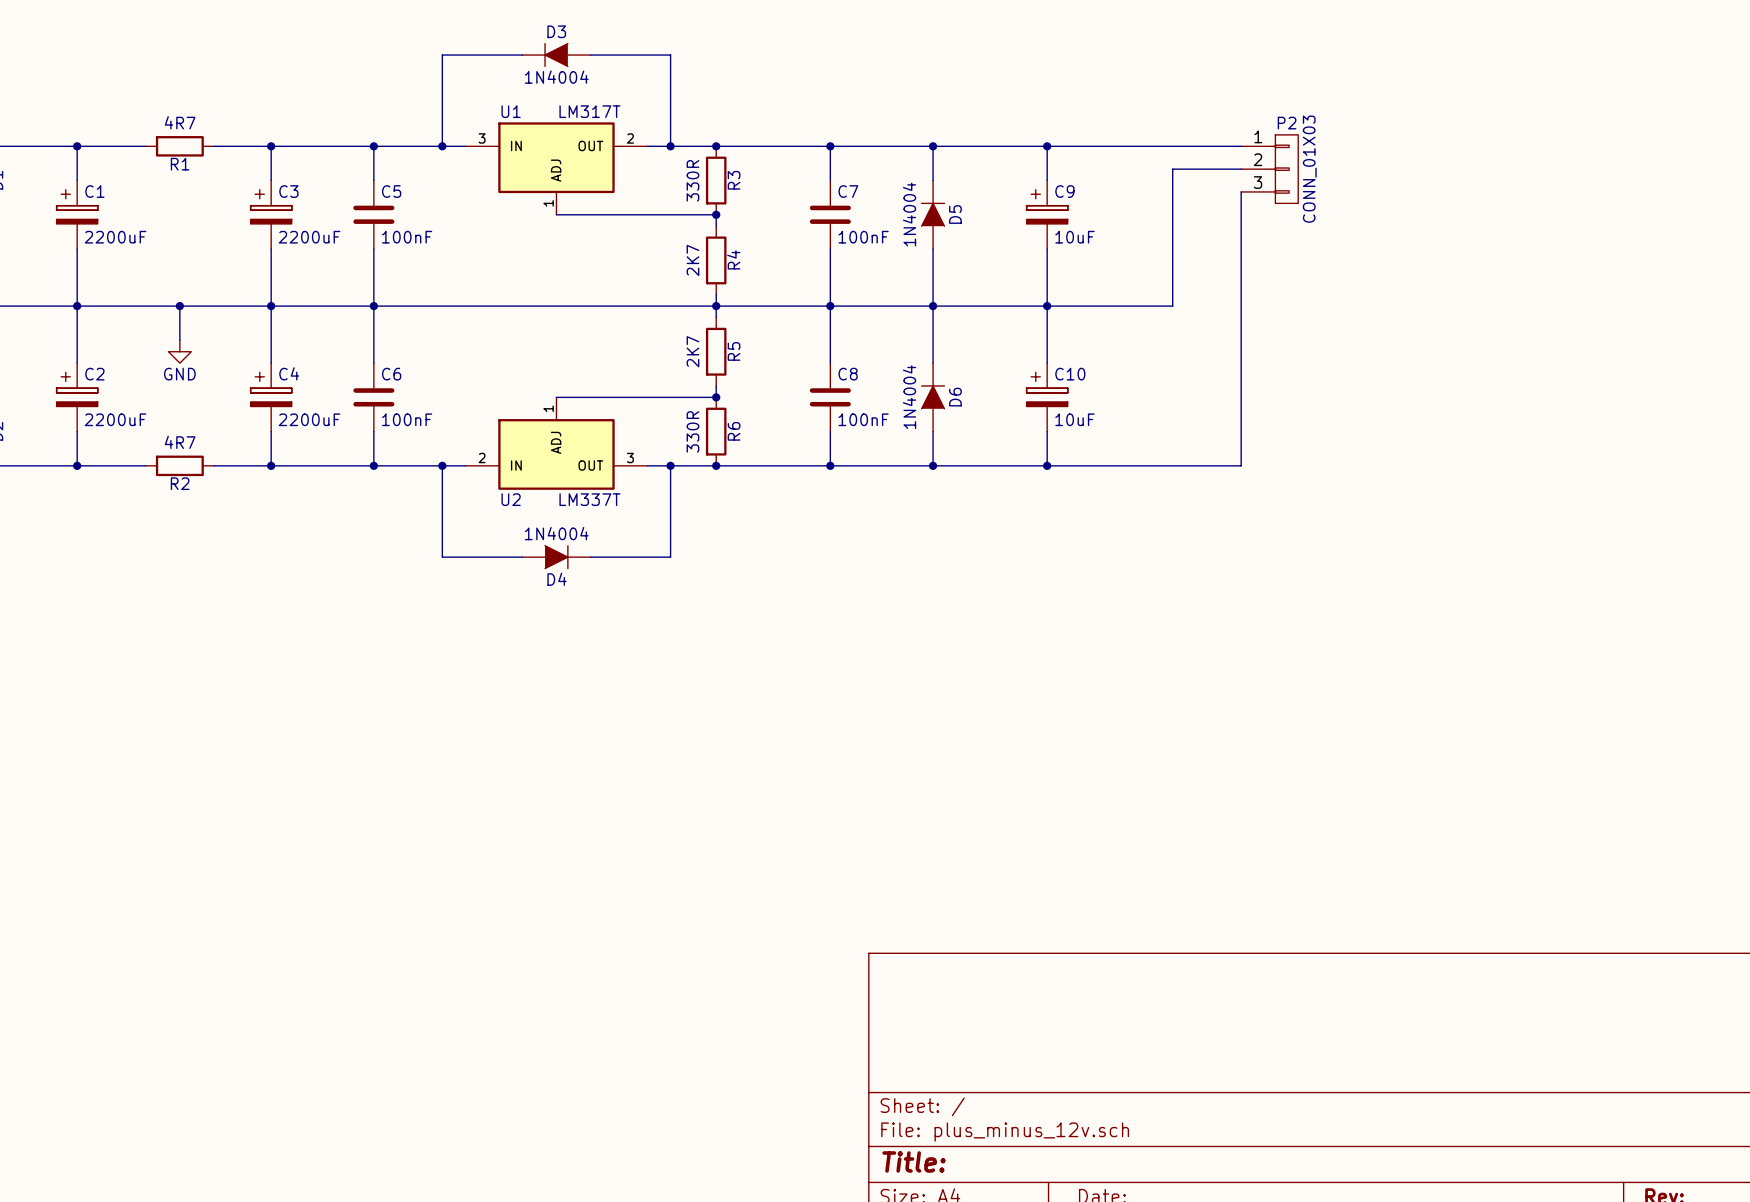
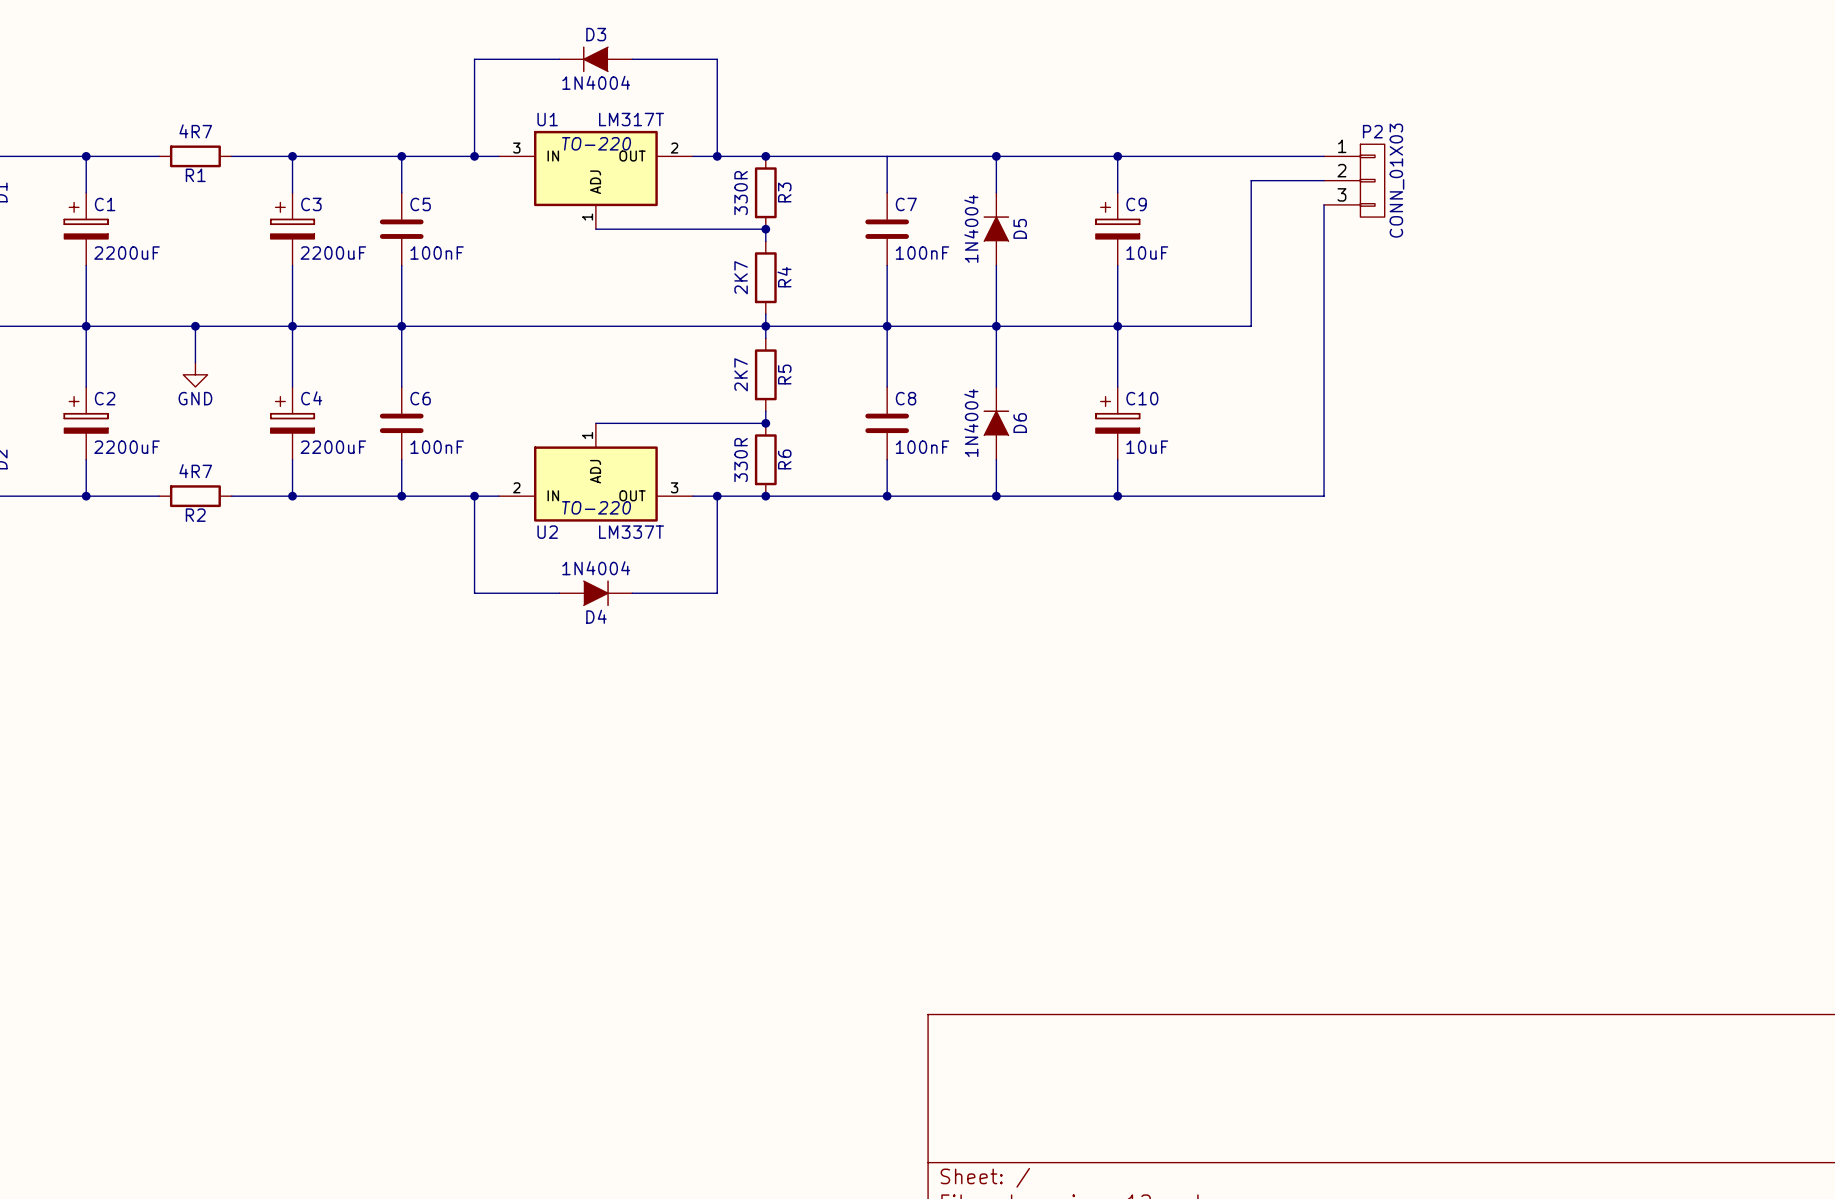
U1 text: none -> TO-220 (596, 143)
junction: (830, 146) -> none
U2 text: none -> TO-220 (596, 507)

